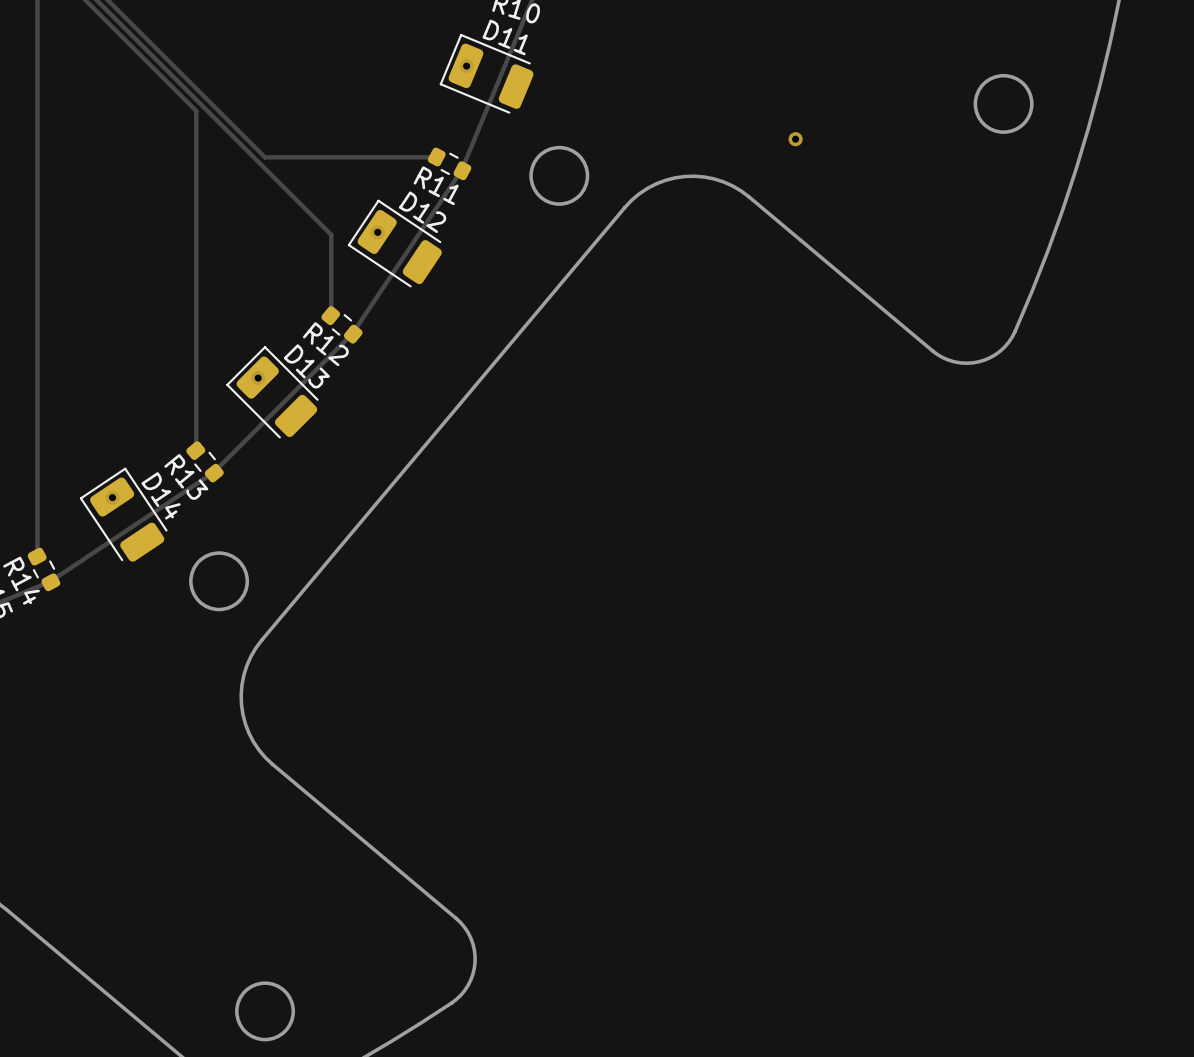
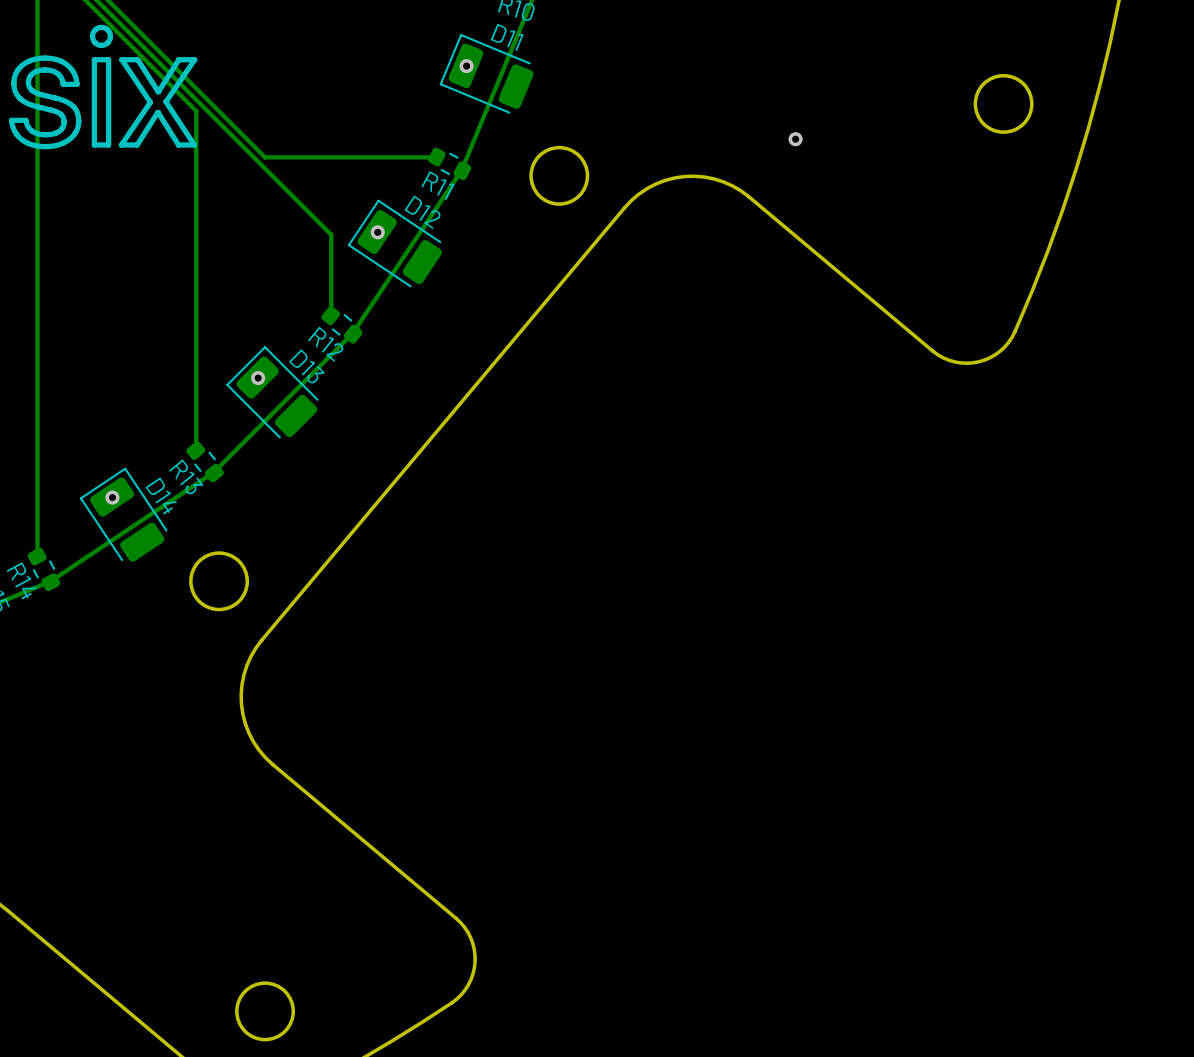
line: none -> (101, 27) (95, 30) (92, 36) (95, 42) (101, 45) (107, 42) (110, 36) (107, 30) (101, 27)
line: none -> (108, 59) (94, 59) (94, 144) (108, 144) (108, 59)
line: none -> (28, 82) (29, 87) (34, 92) (63, 100) (75, 108) (78, 116) (78, 125) (74, 133) (68, 140) (51, 146) (31, 144) (17, 135) (11, 120) (25, 120) (29, 129) (38, 134) (51, 134) (59, 130) (64, 123) (61, 115) (21, 99) (15, 90) (14, 77) (22, 65) (39, 58) (58, 60) (72, 70) (76, 84) (63, 84) (57, 73) (46, 70) (33, 73) (28, 82)
line: none -> (158, 91) (178, 59) (194, 59) (165, 101) (194, 144) (178, 144) (158, 112)
line: none -> (158, 91) (137, 59) (121, 59) (150, 102) (121, 144) (137, 144) (157, 112)

